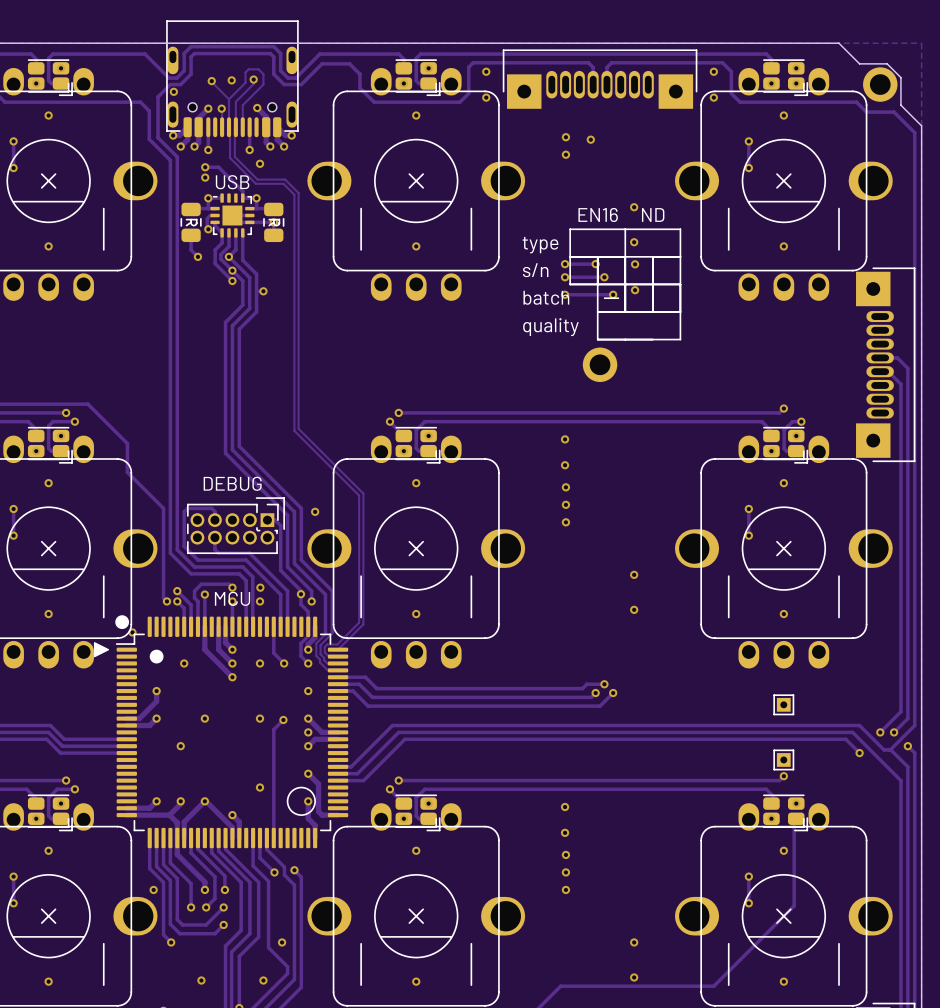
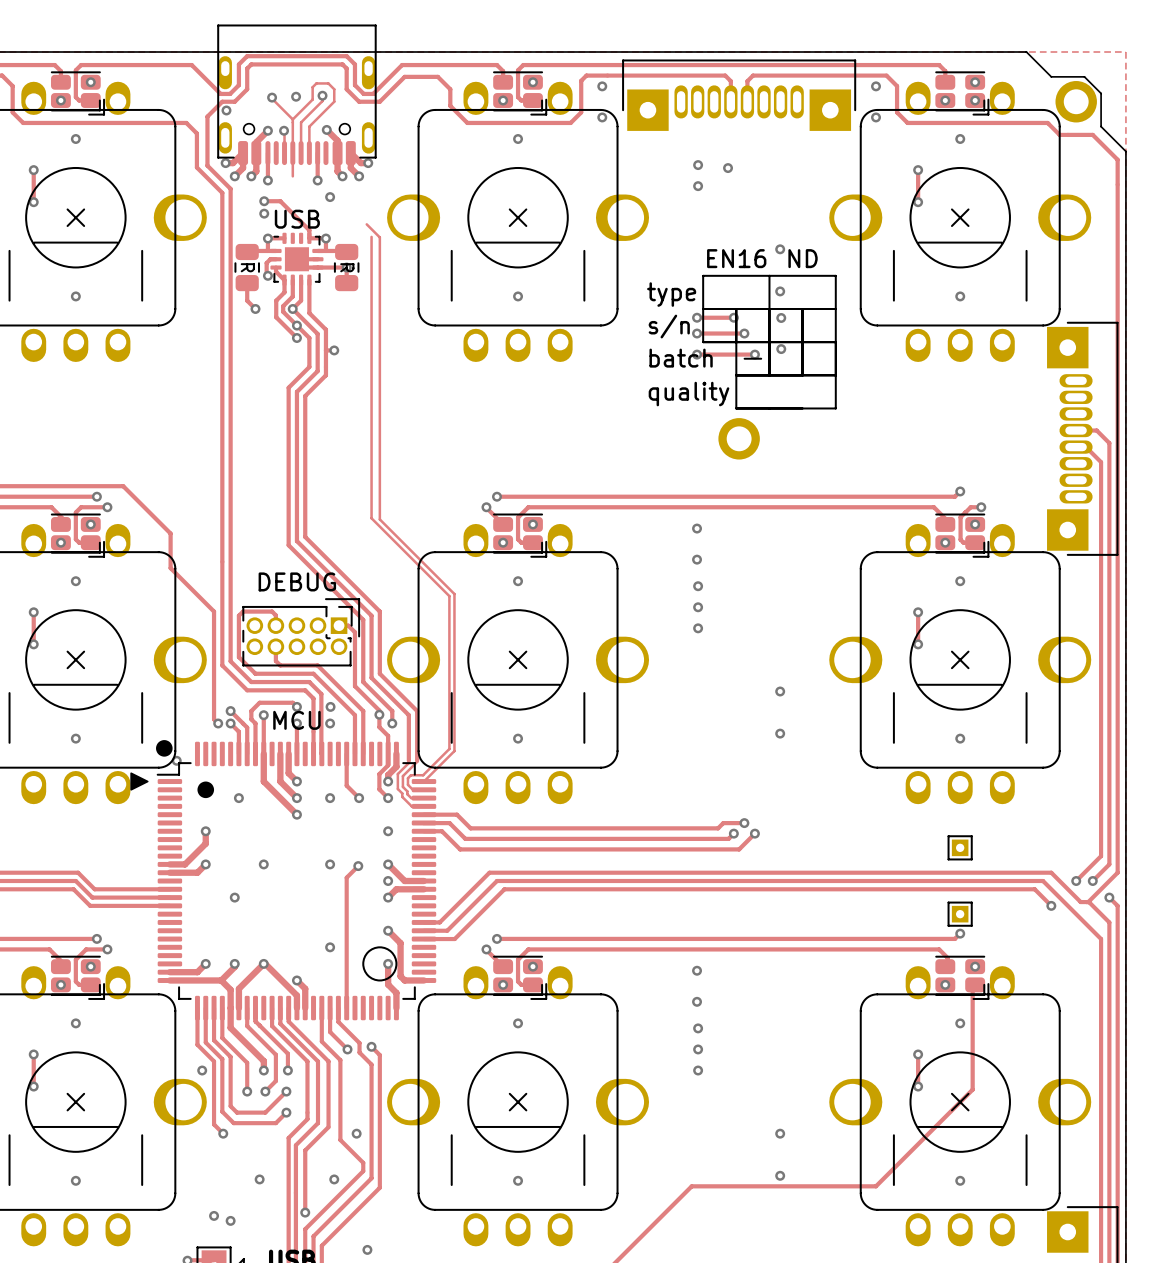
track: (228, 127) (230, 157) (255, 183) (283, 183) (294, 196) -> (292, 153) (292, 176)
track: (235, 127) (234, 156) (257, 179) (285, 179) (298, 193) (298, 428) (363, 493) -> (366, 224) (379, 237) (379, 519) (454, 594)
via: (315, 511) -> none

